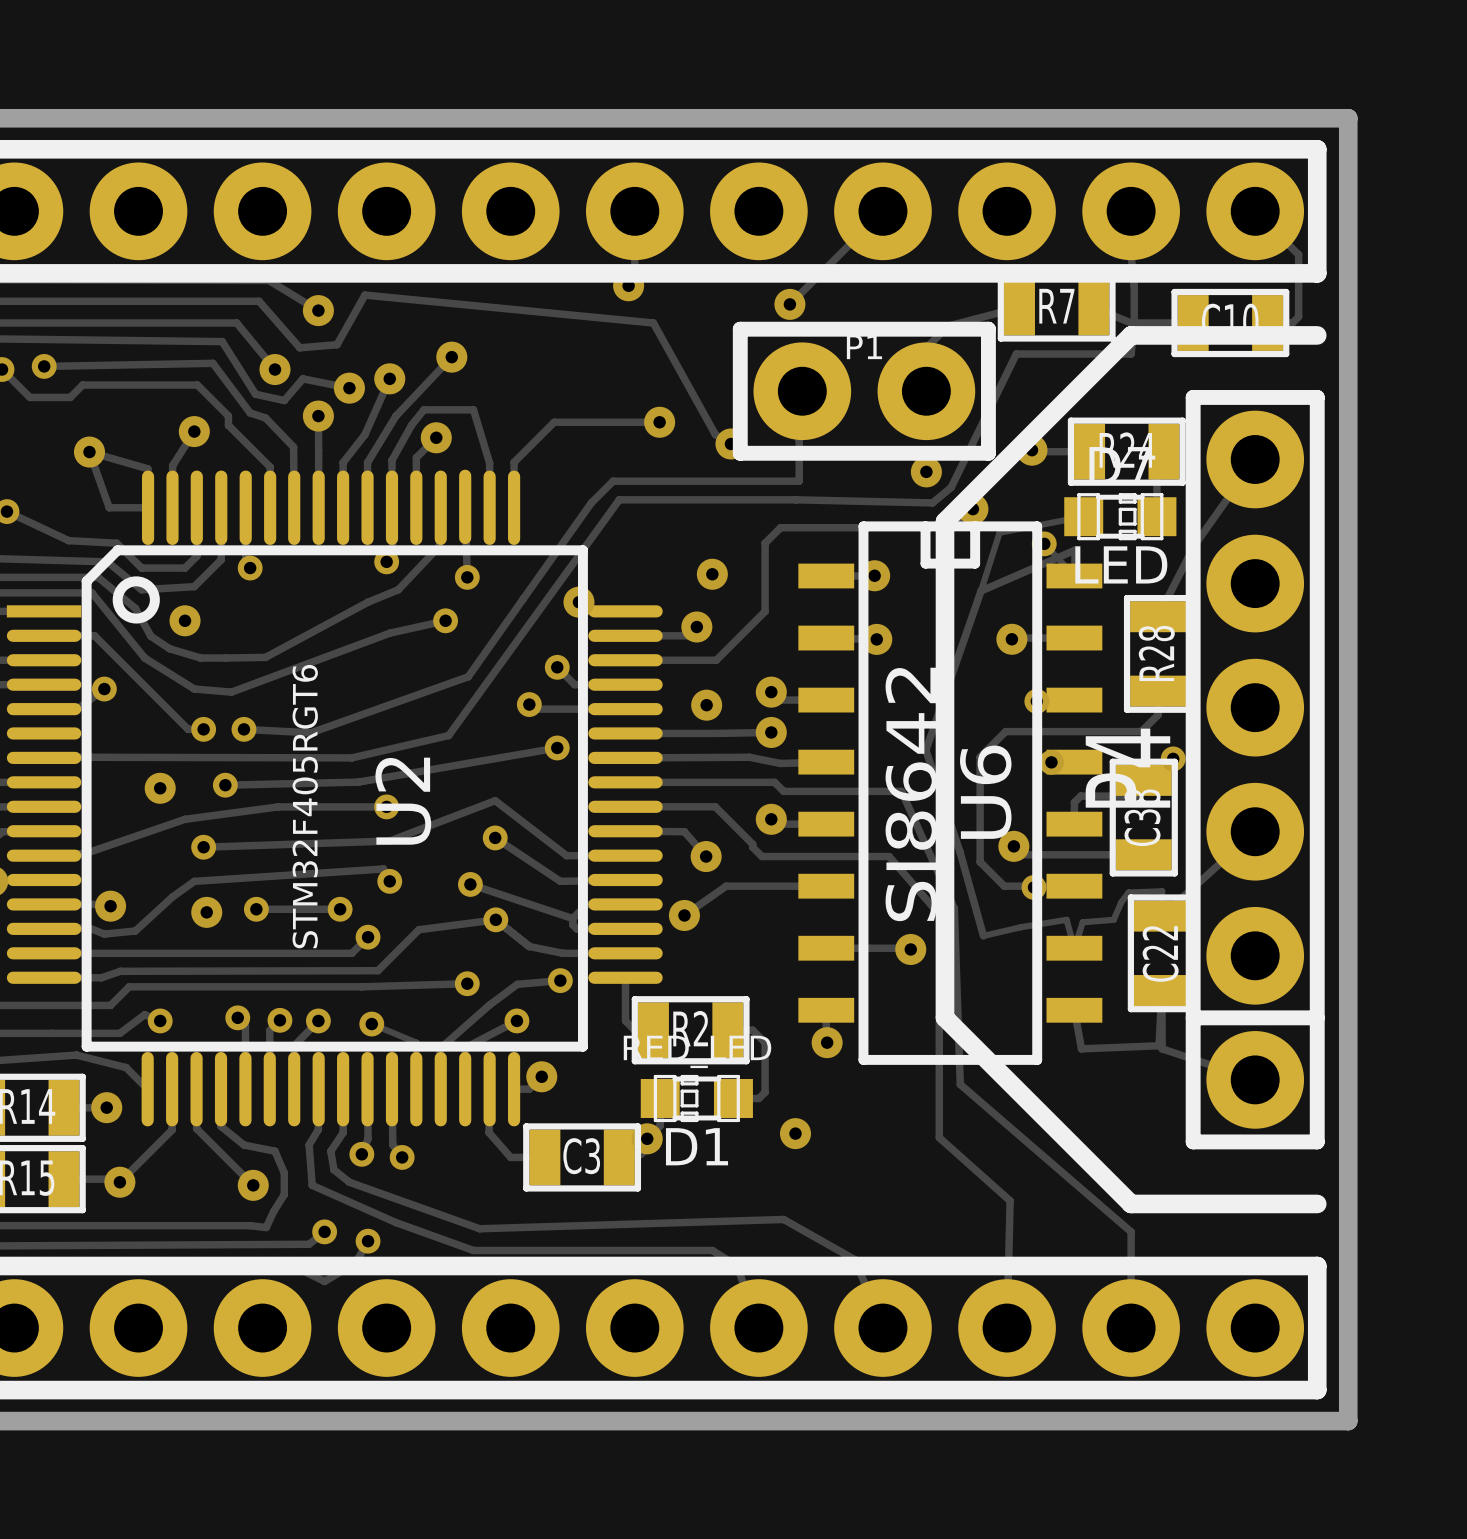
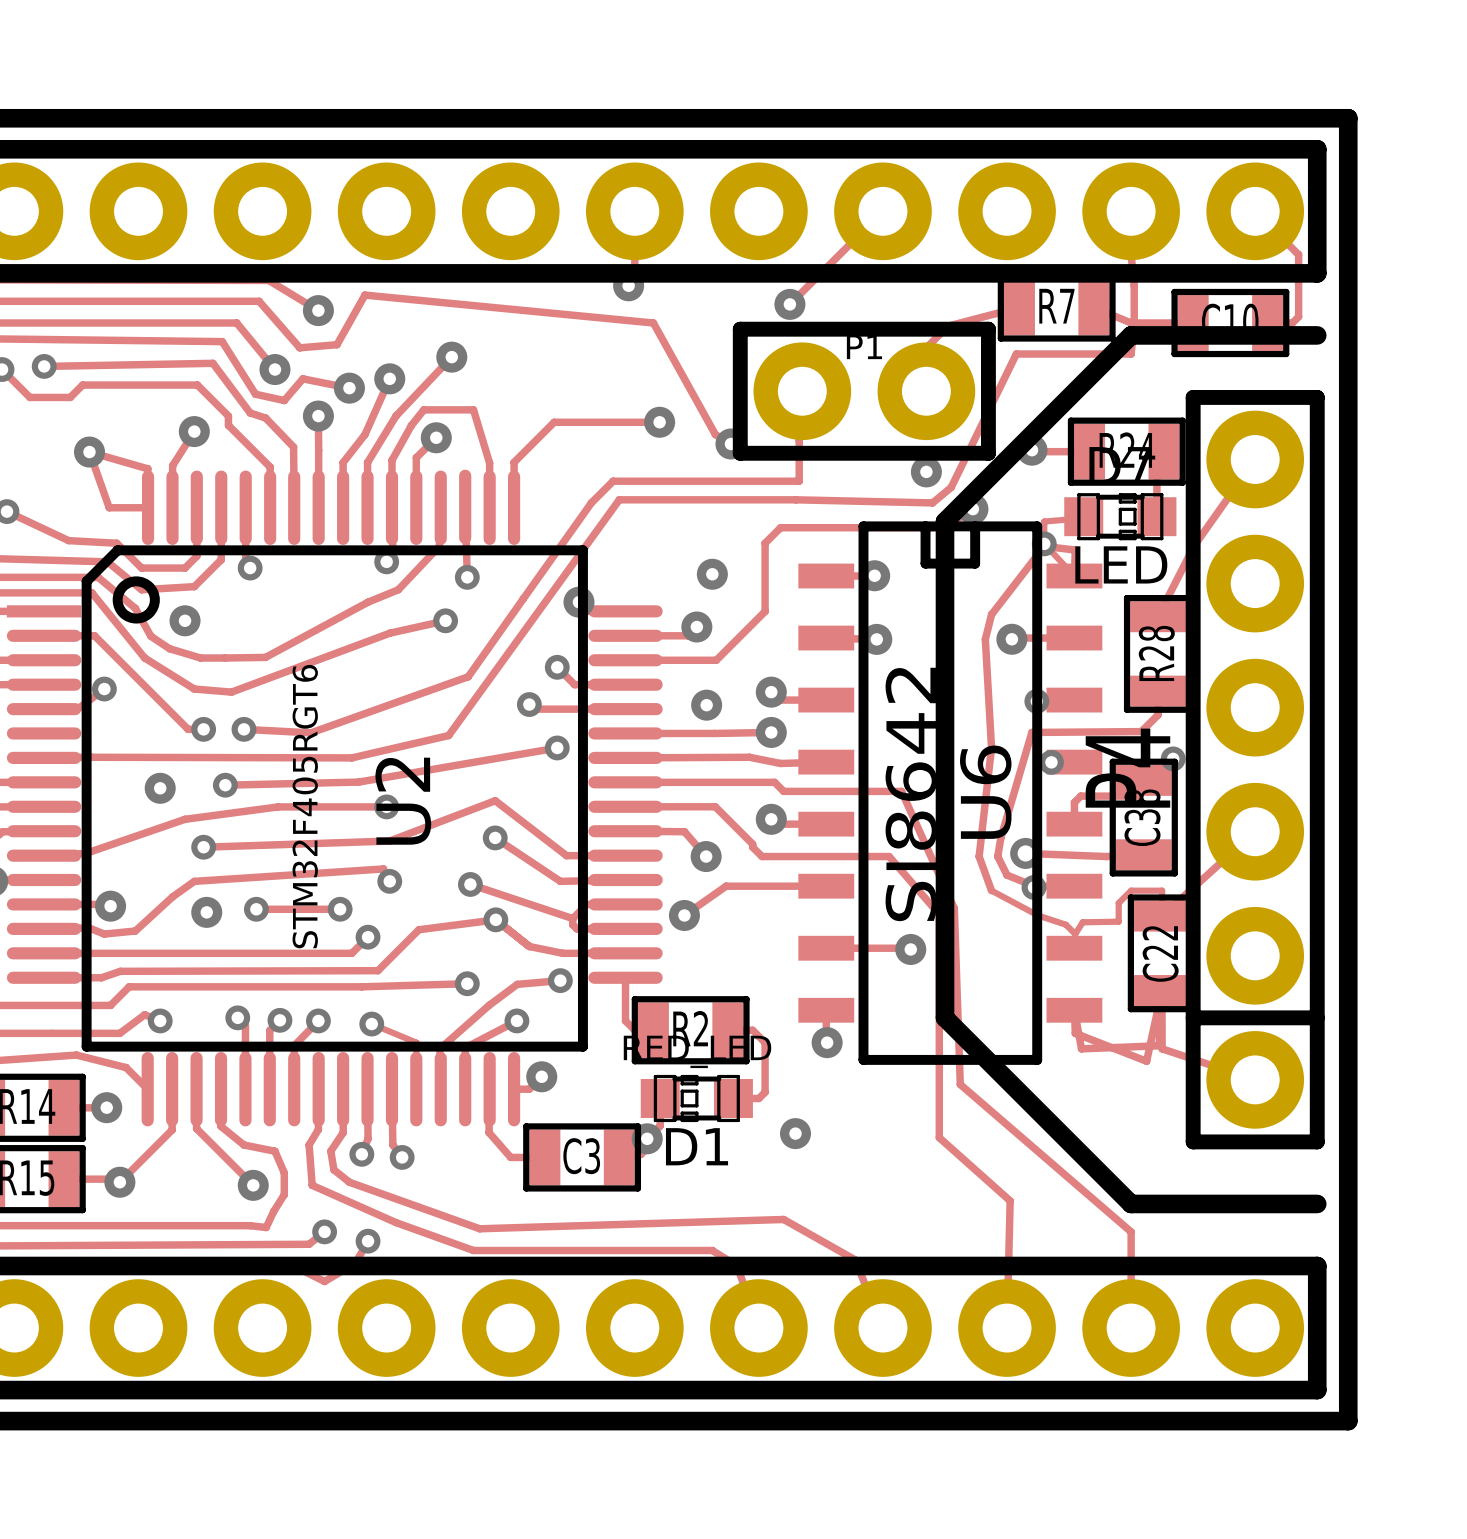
track: none -> (1085, 515) (1081, 518) (1044, 521) (1044, 546)
track: (1083, 516) (999, 532) (980, 591) -> none
track: (1075, 550) (980, 591) -> (1075, 550) (1044, 546)
track: (980, 591) (925, 750) (959, 851) (983, 935) (1066, 919) (1074, 948) (1082, 922) (1113, 919) (1121, 902) (1128, 892) (1162, 891) (1161, 916) -> (1044, 546) (991, 614) (985, 639) (991, 747) (979, 856) (991, 890) (1038, 915) (1065, 924) (1075, 934) (1082, 922) (1118, 921) (1118, 903) (1131, 890) (1162, 890) (1161, 916)
track: (1141, 731) (1005, 731) (980, 757) (980, 862) (1004, 886) (1034, 886) -> (1141, 731) (1031, 732) (1000, 837) (997, 856) (1007, 875) (1034, 886)
track: (1013, 846) (1022, 854) (1143, 854) -> (1025, 853) (1106, 856) (1143, 854)
via position: (1013, 846) -> (1025, 853)
track: none -> (1161, 990) (1146, 1061) (1075, 1033) (1074, 1010)

